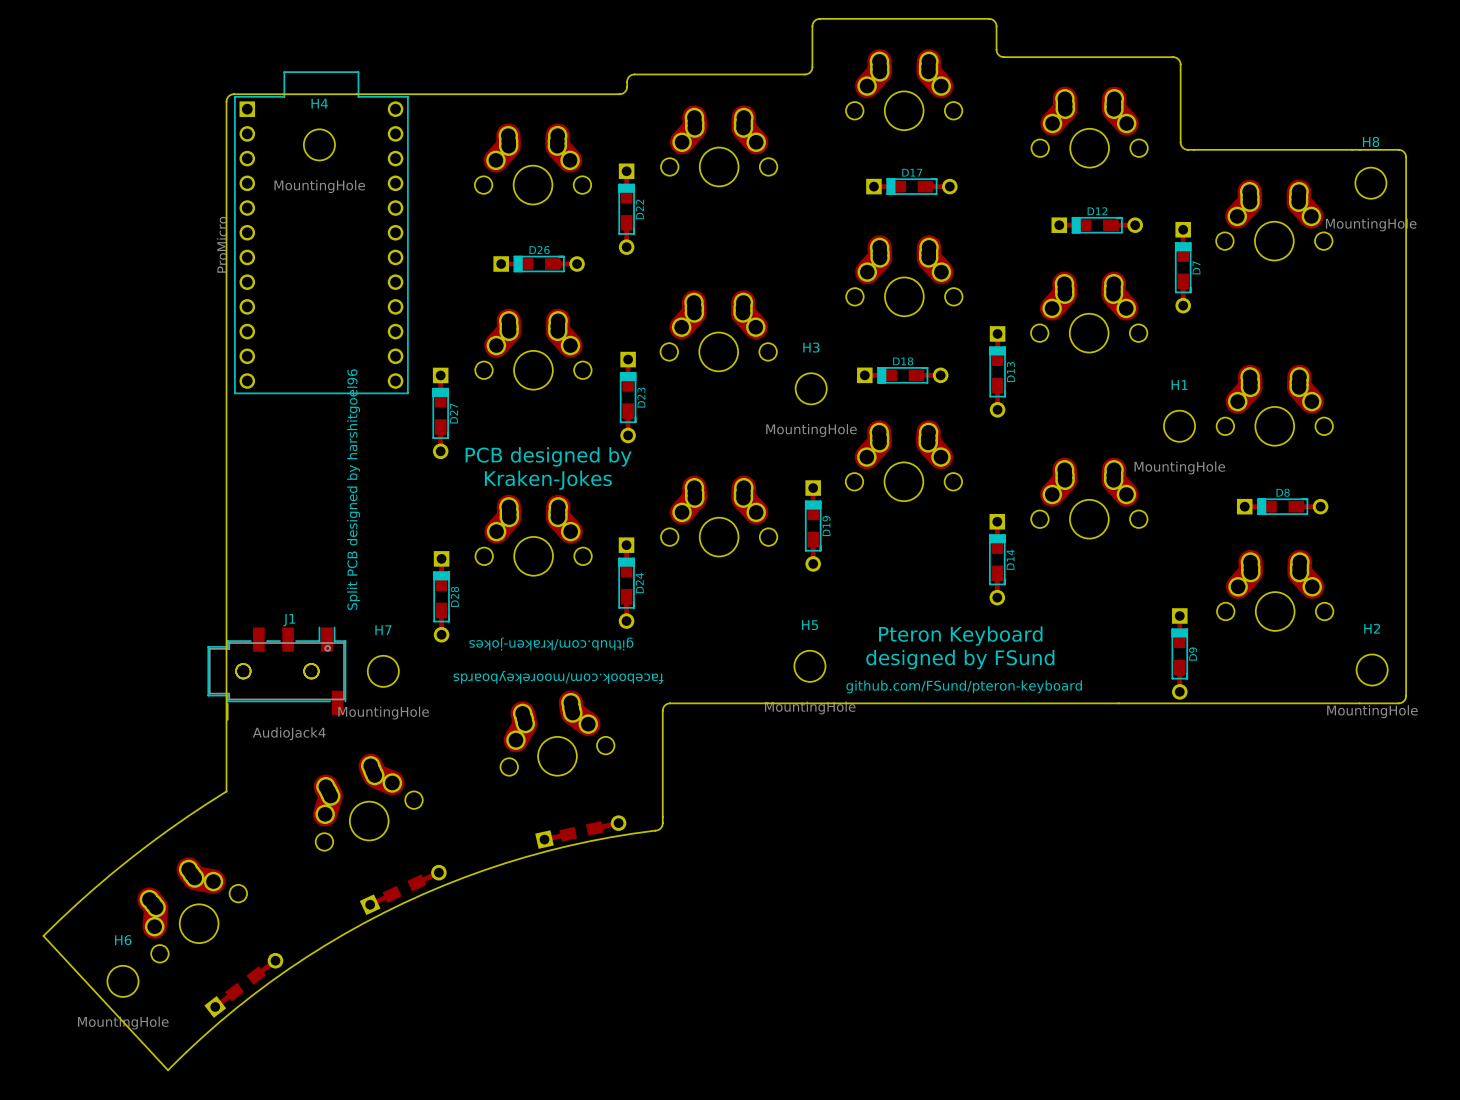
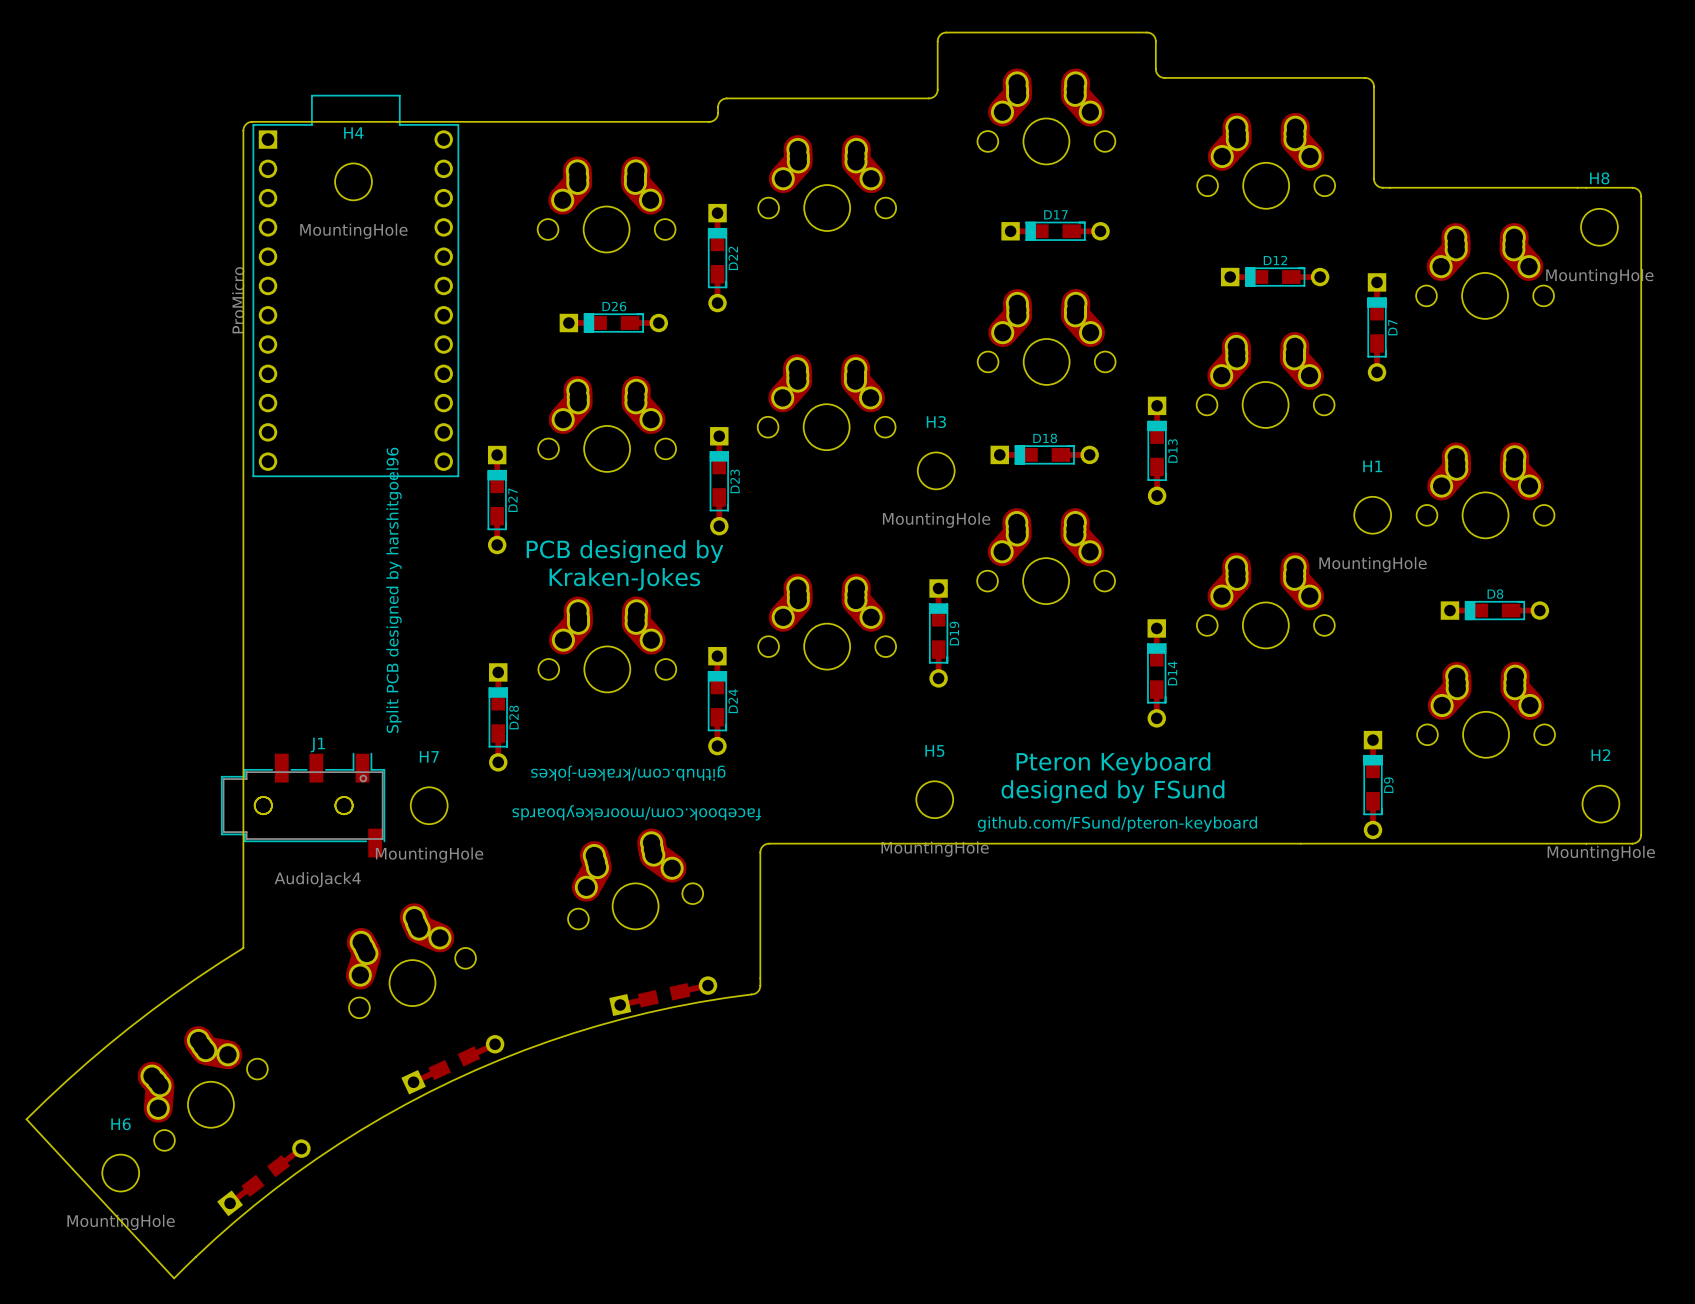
board edge: (227, 703) (227, 719) -> none

